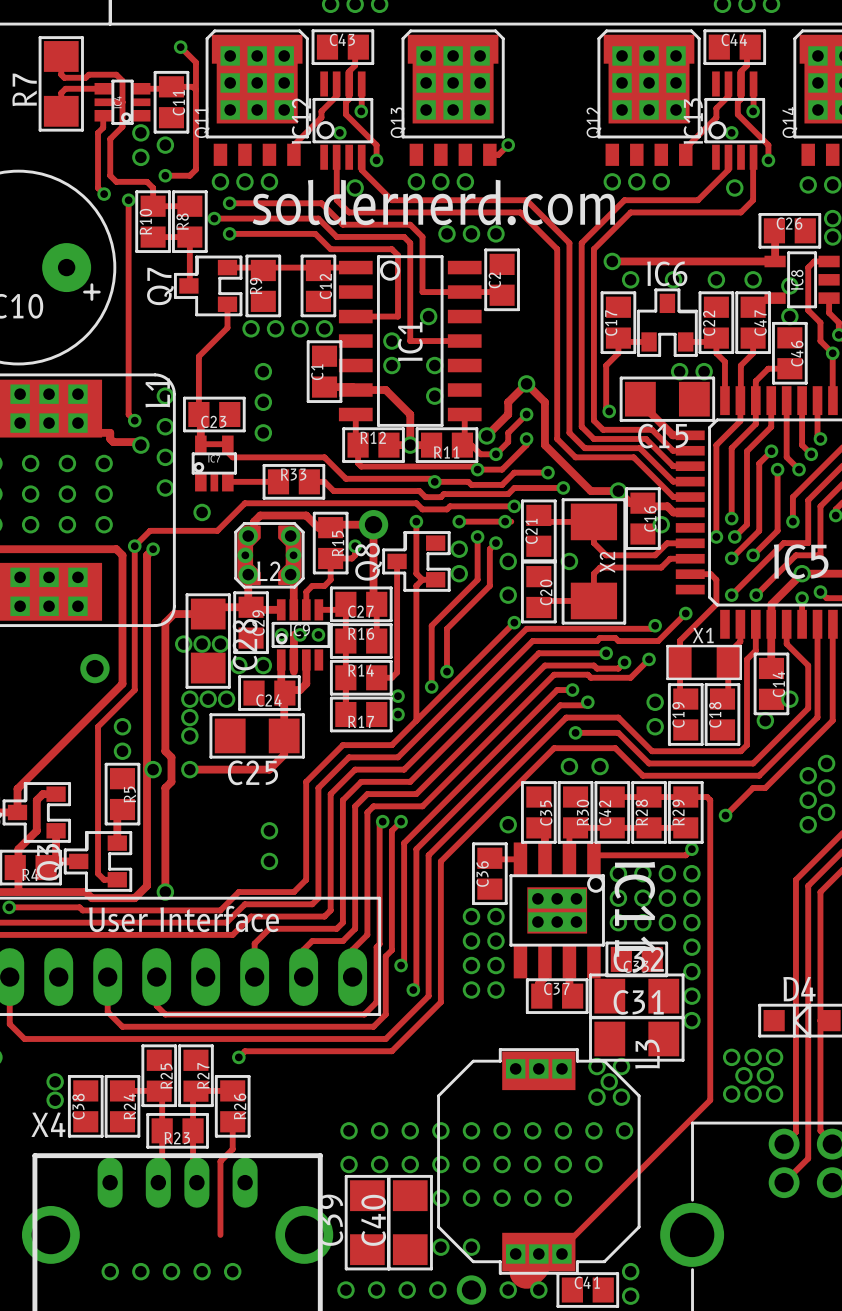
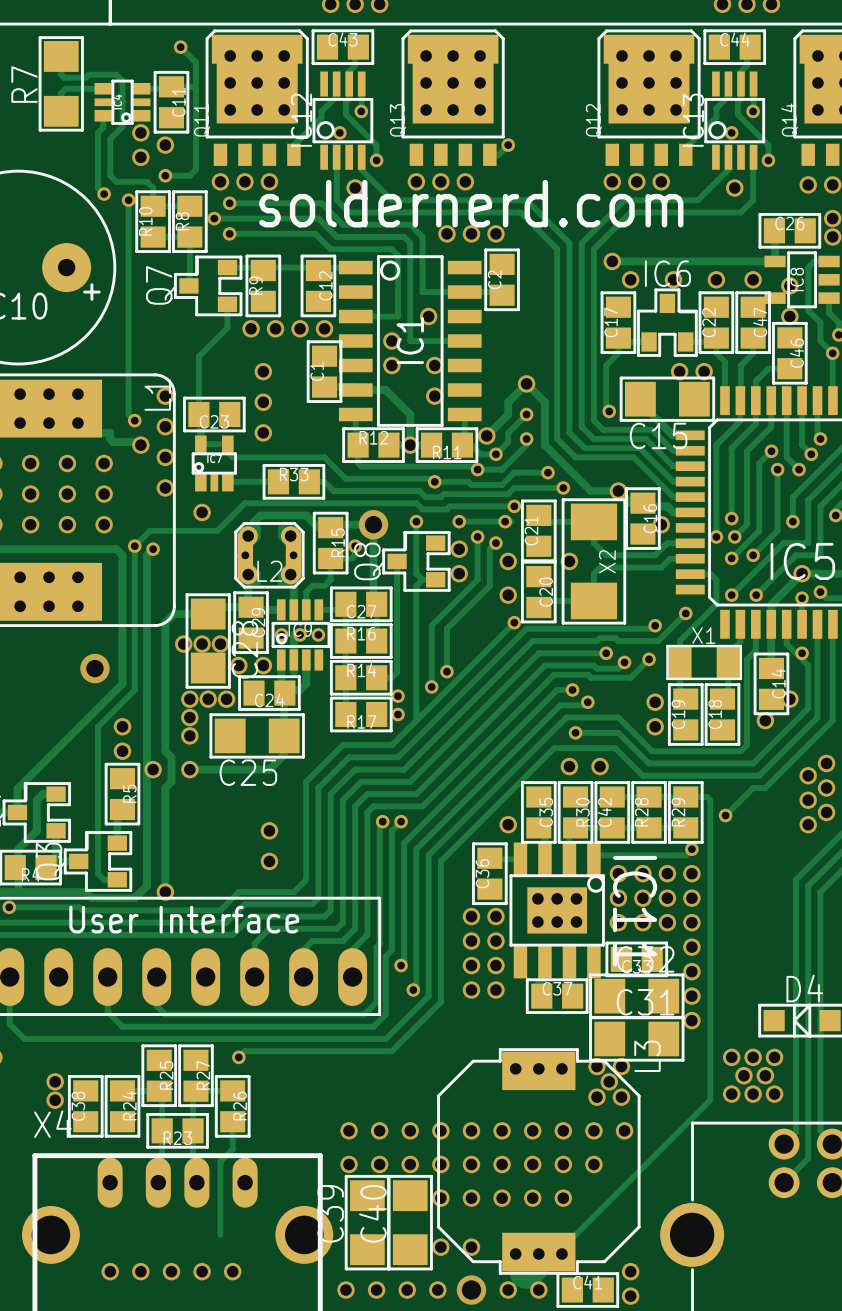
via: none -> (802, 653)

